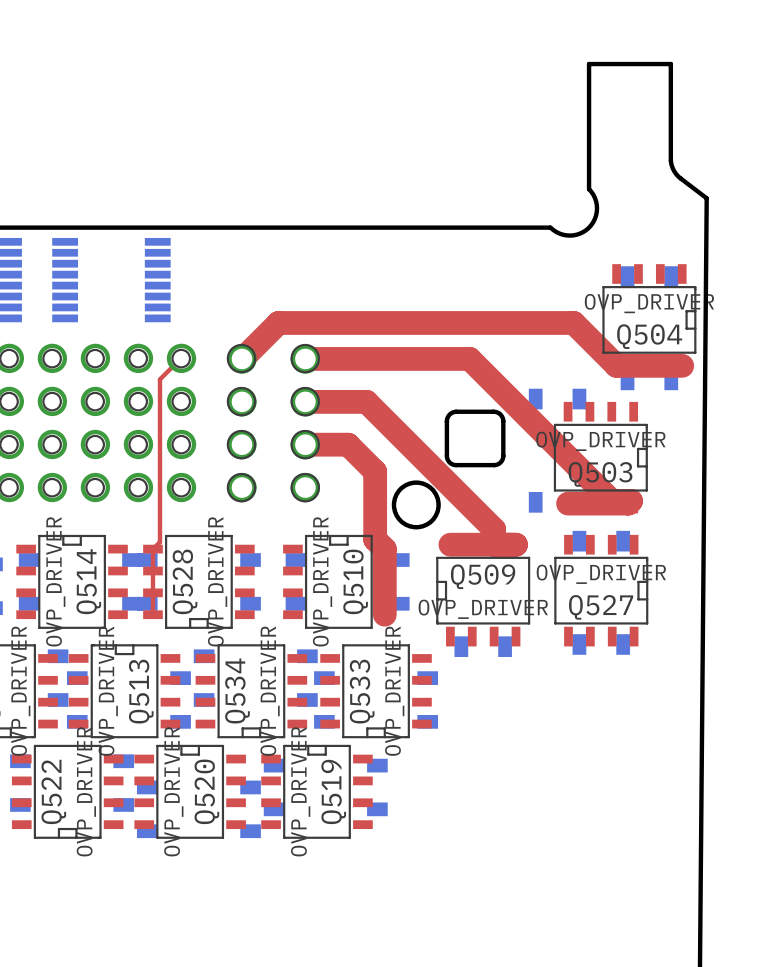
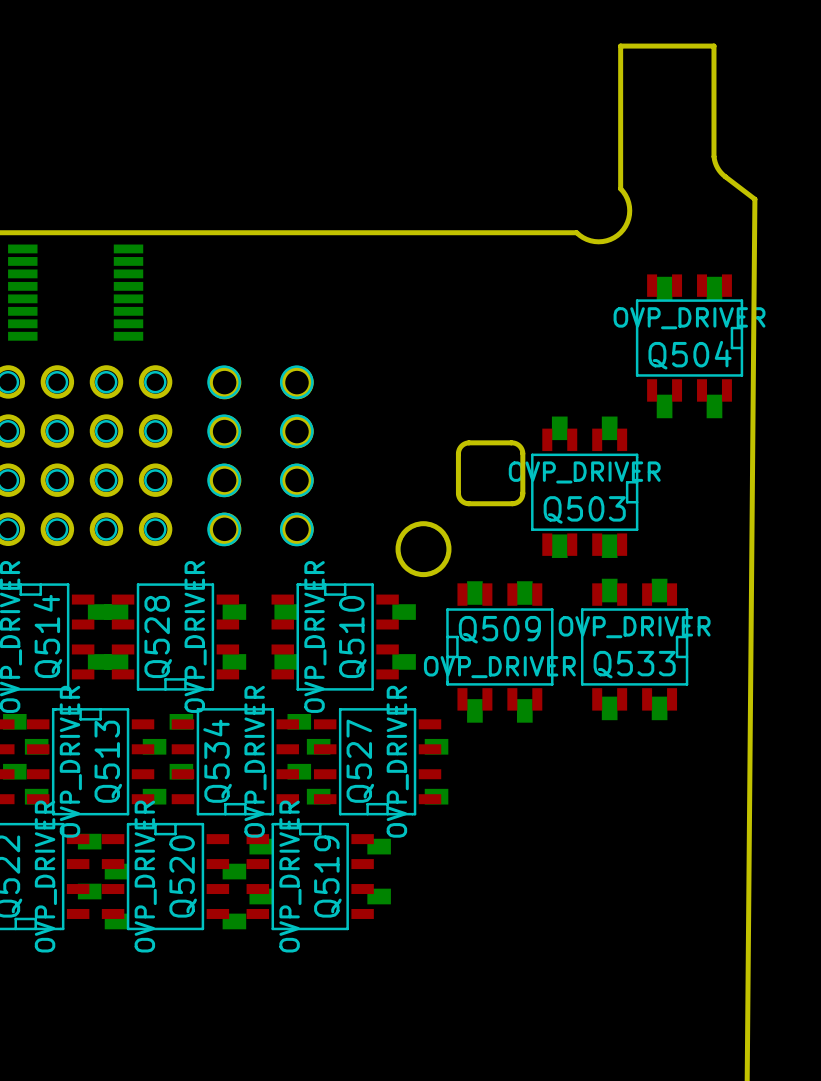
top track: (181, 358) (159, 379) (159, 542) (152, 549) (152, 614) -> none
top track: (241, 358) (278, 322) (573, 322) (616, 365) (682, 365) -> none
top track: (305, 358) (469, 358) (611, 500) (631, 500) (628, 503) (568, 503) -> none
top track: (305, 401) (366, 401) (494, 529) (494, 544) -> none
top track: (305, 444) (348, 444) (375, 471) (375, 539) (384, 549) (384, 614) -> none
Q503 position: (600, 457) -> (584, 492)
top track: (450, 544) (516, 544) -> none
Q527 name: Q527 (601, 607) -> Q533 (634, 664)
Q533 name: Q533 (362, 691) -> Q527 (360, 761)

